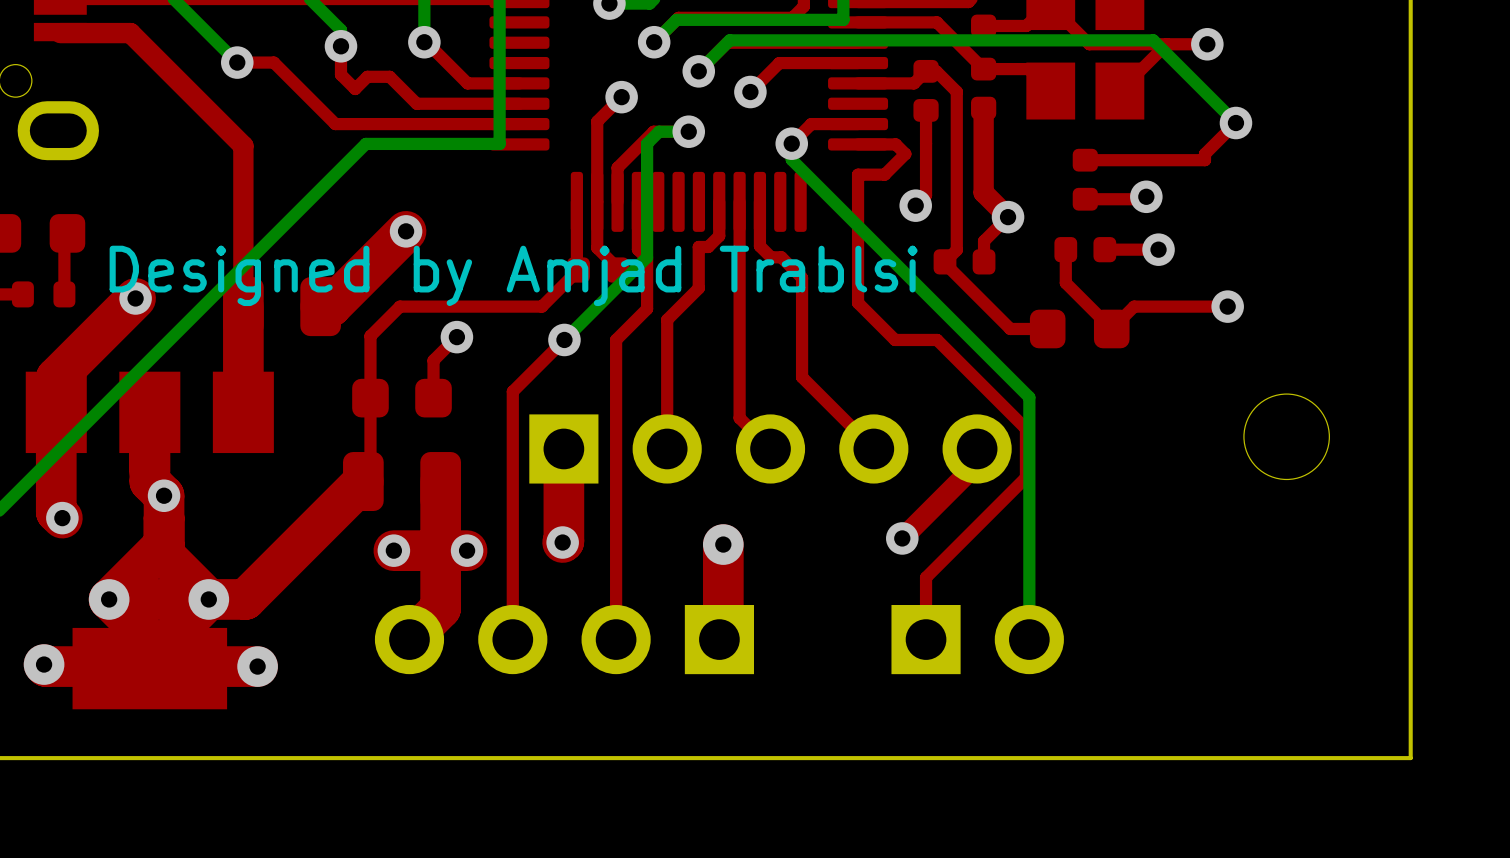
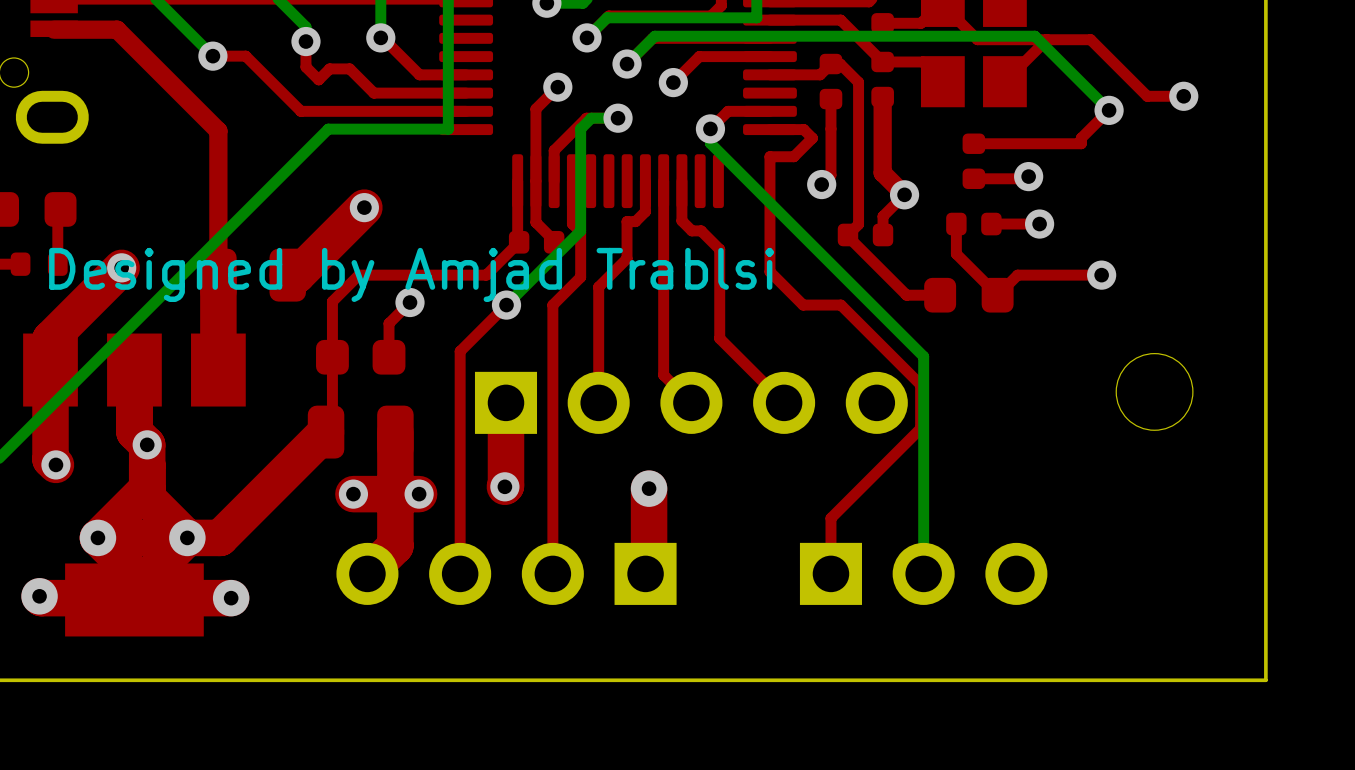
top track: none -> (1083, 39) (1090, 39) (1147, 96) (1183, 96)
via position: (1207, 44) -> (1183, 96)
text position: Designed by Amjad Trablsi (513, 275) -> Designed by Amjad Trablsi (411, 274)
top track: (977, 448) (977, 463) (902, 538) -> none
via: (902, 538) -> none
part: none -> (923, 573)

